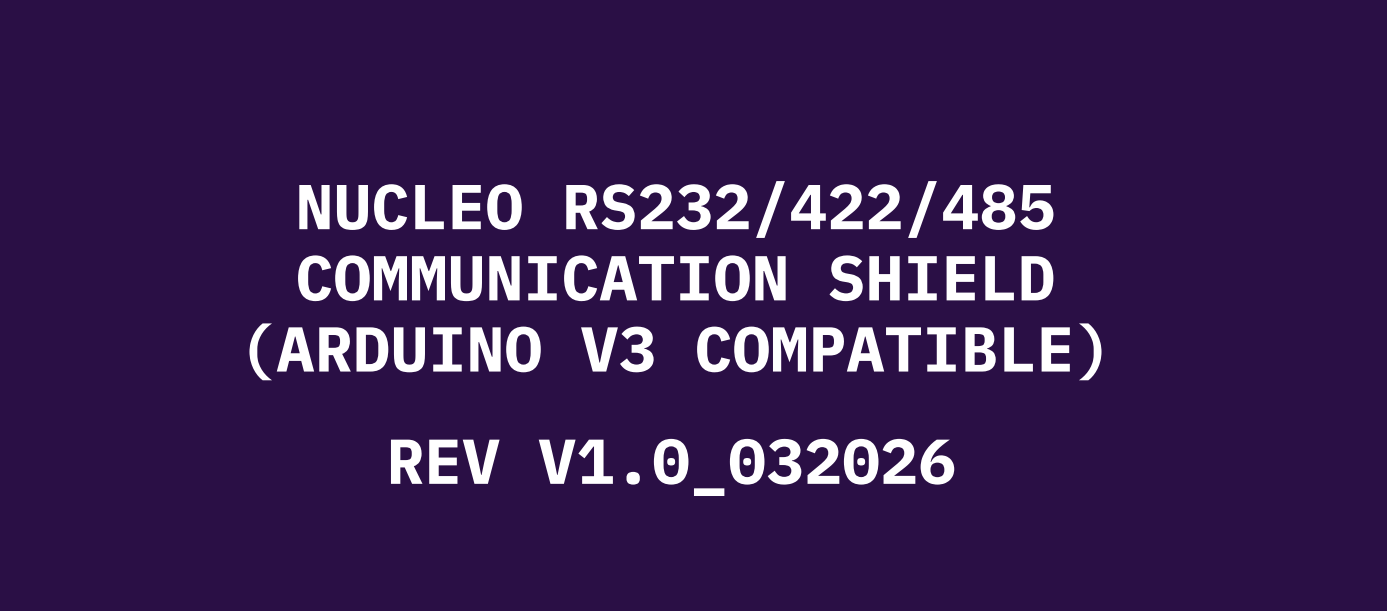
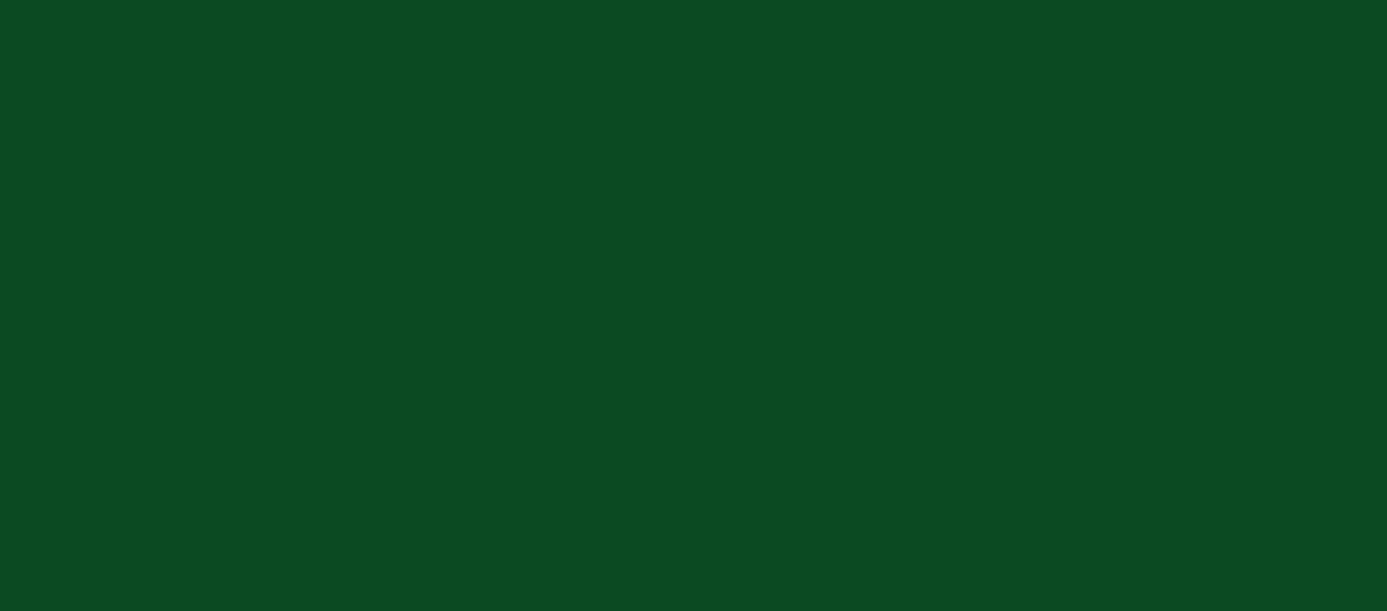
text: NUCLEO RS232/422/485 (676, 209) -> none
text: COMMUNICATION SHIELD (675, 278) -> none
text: (ARDUINO V3 COMPATIBLE) (675, 351) -> none
text: REV V1.0_032026 (672, 467) -> none

